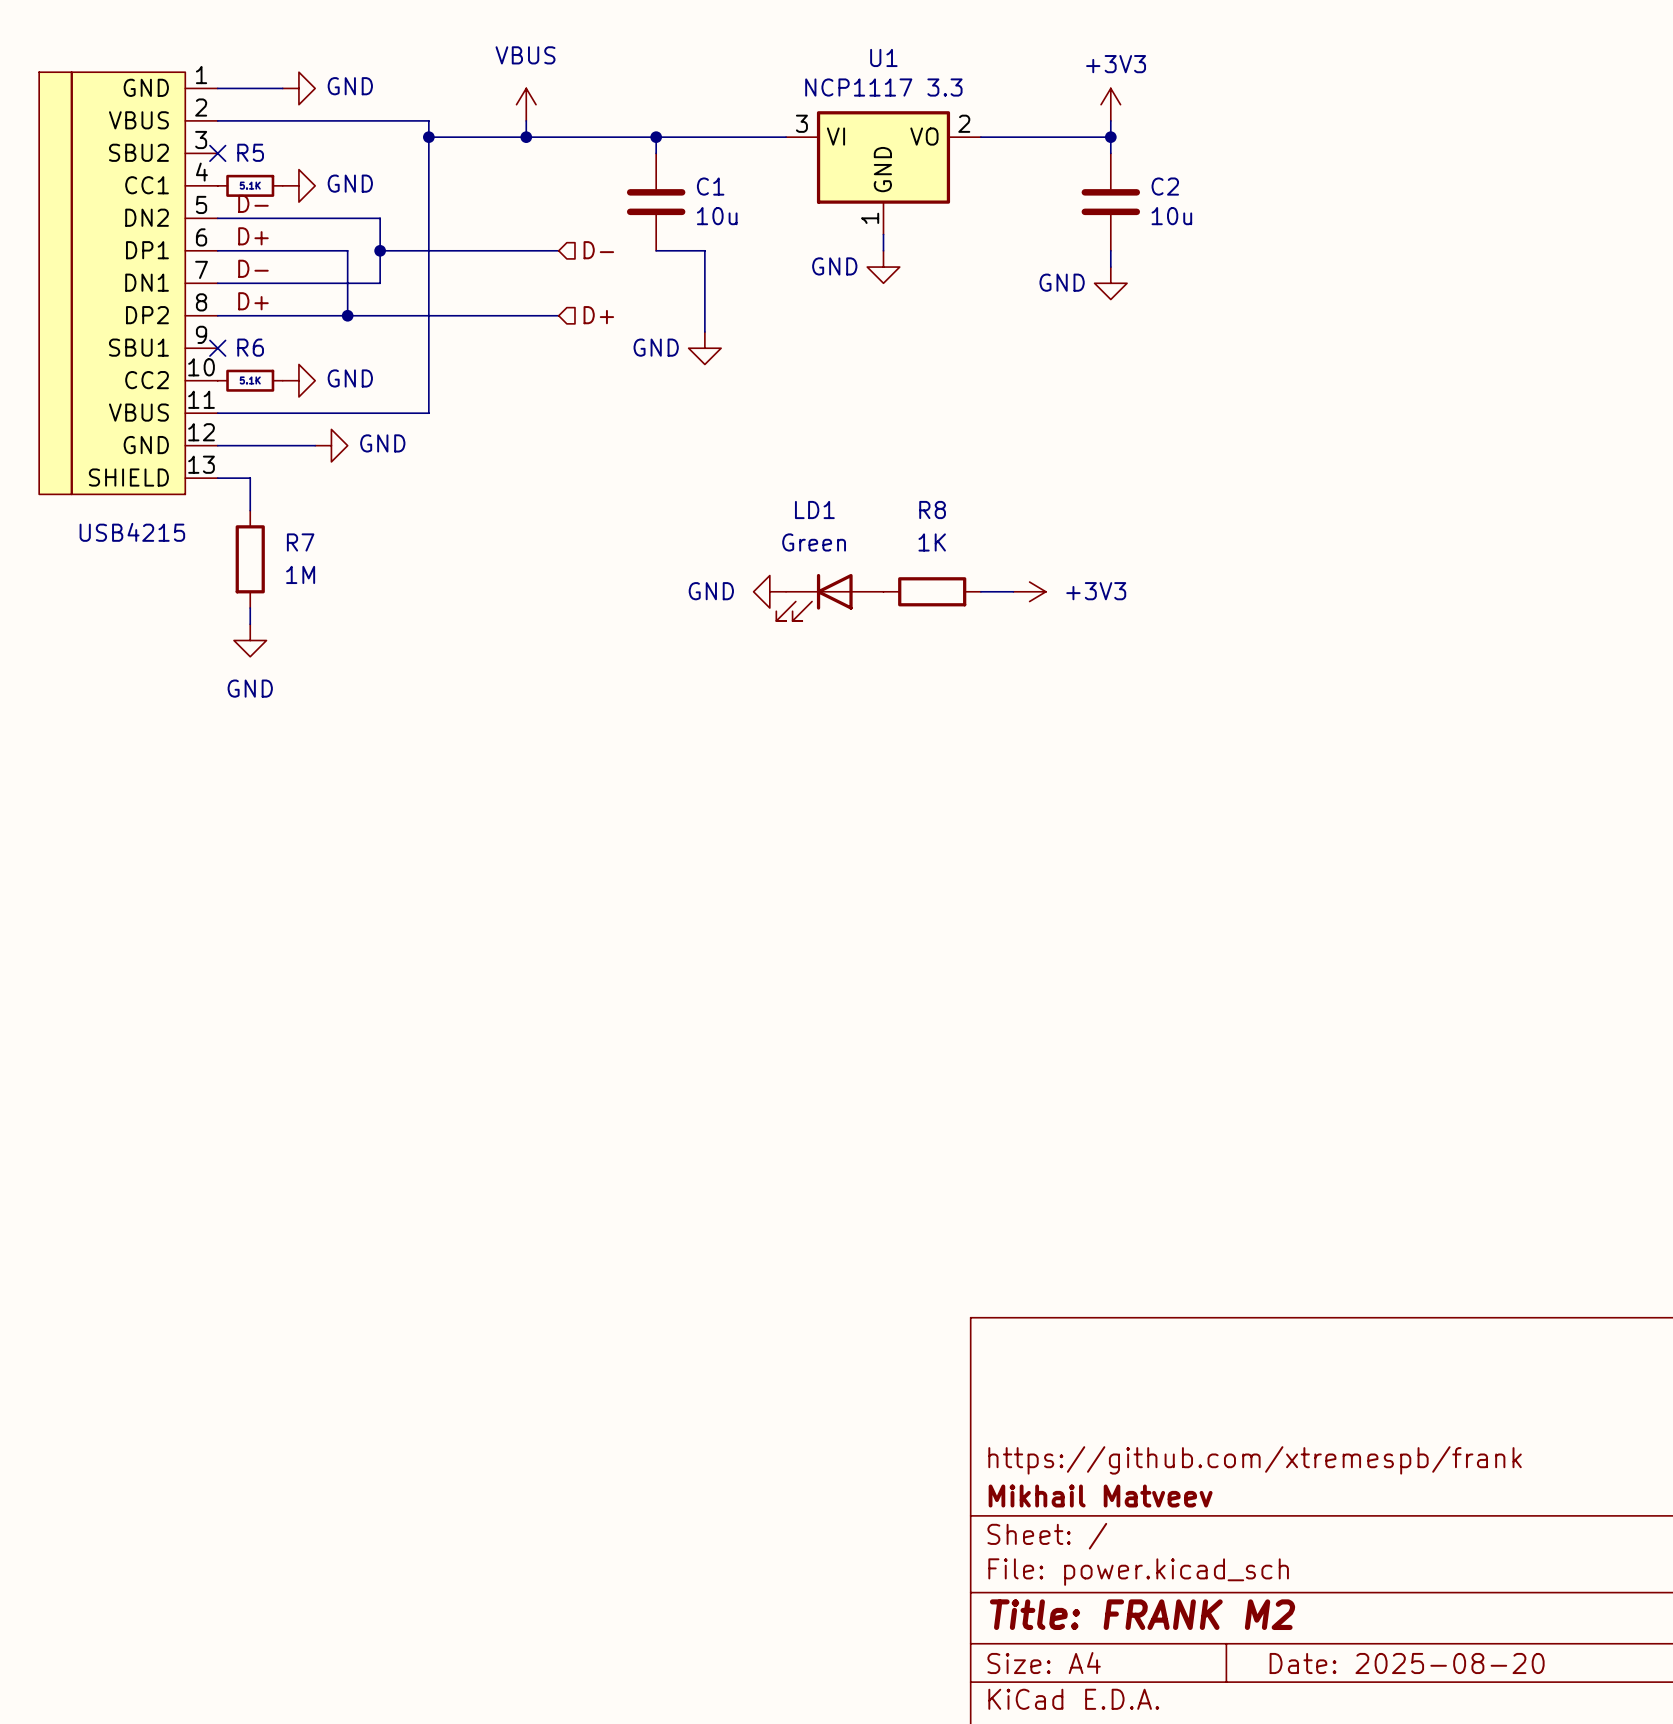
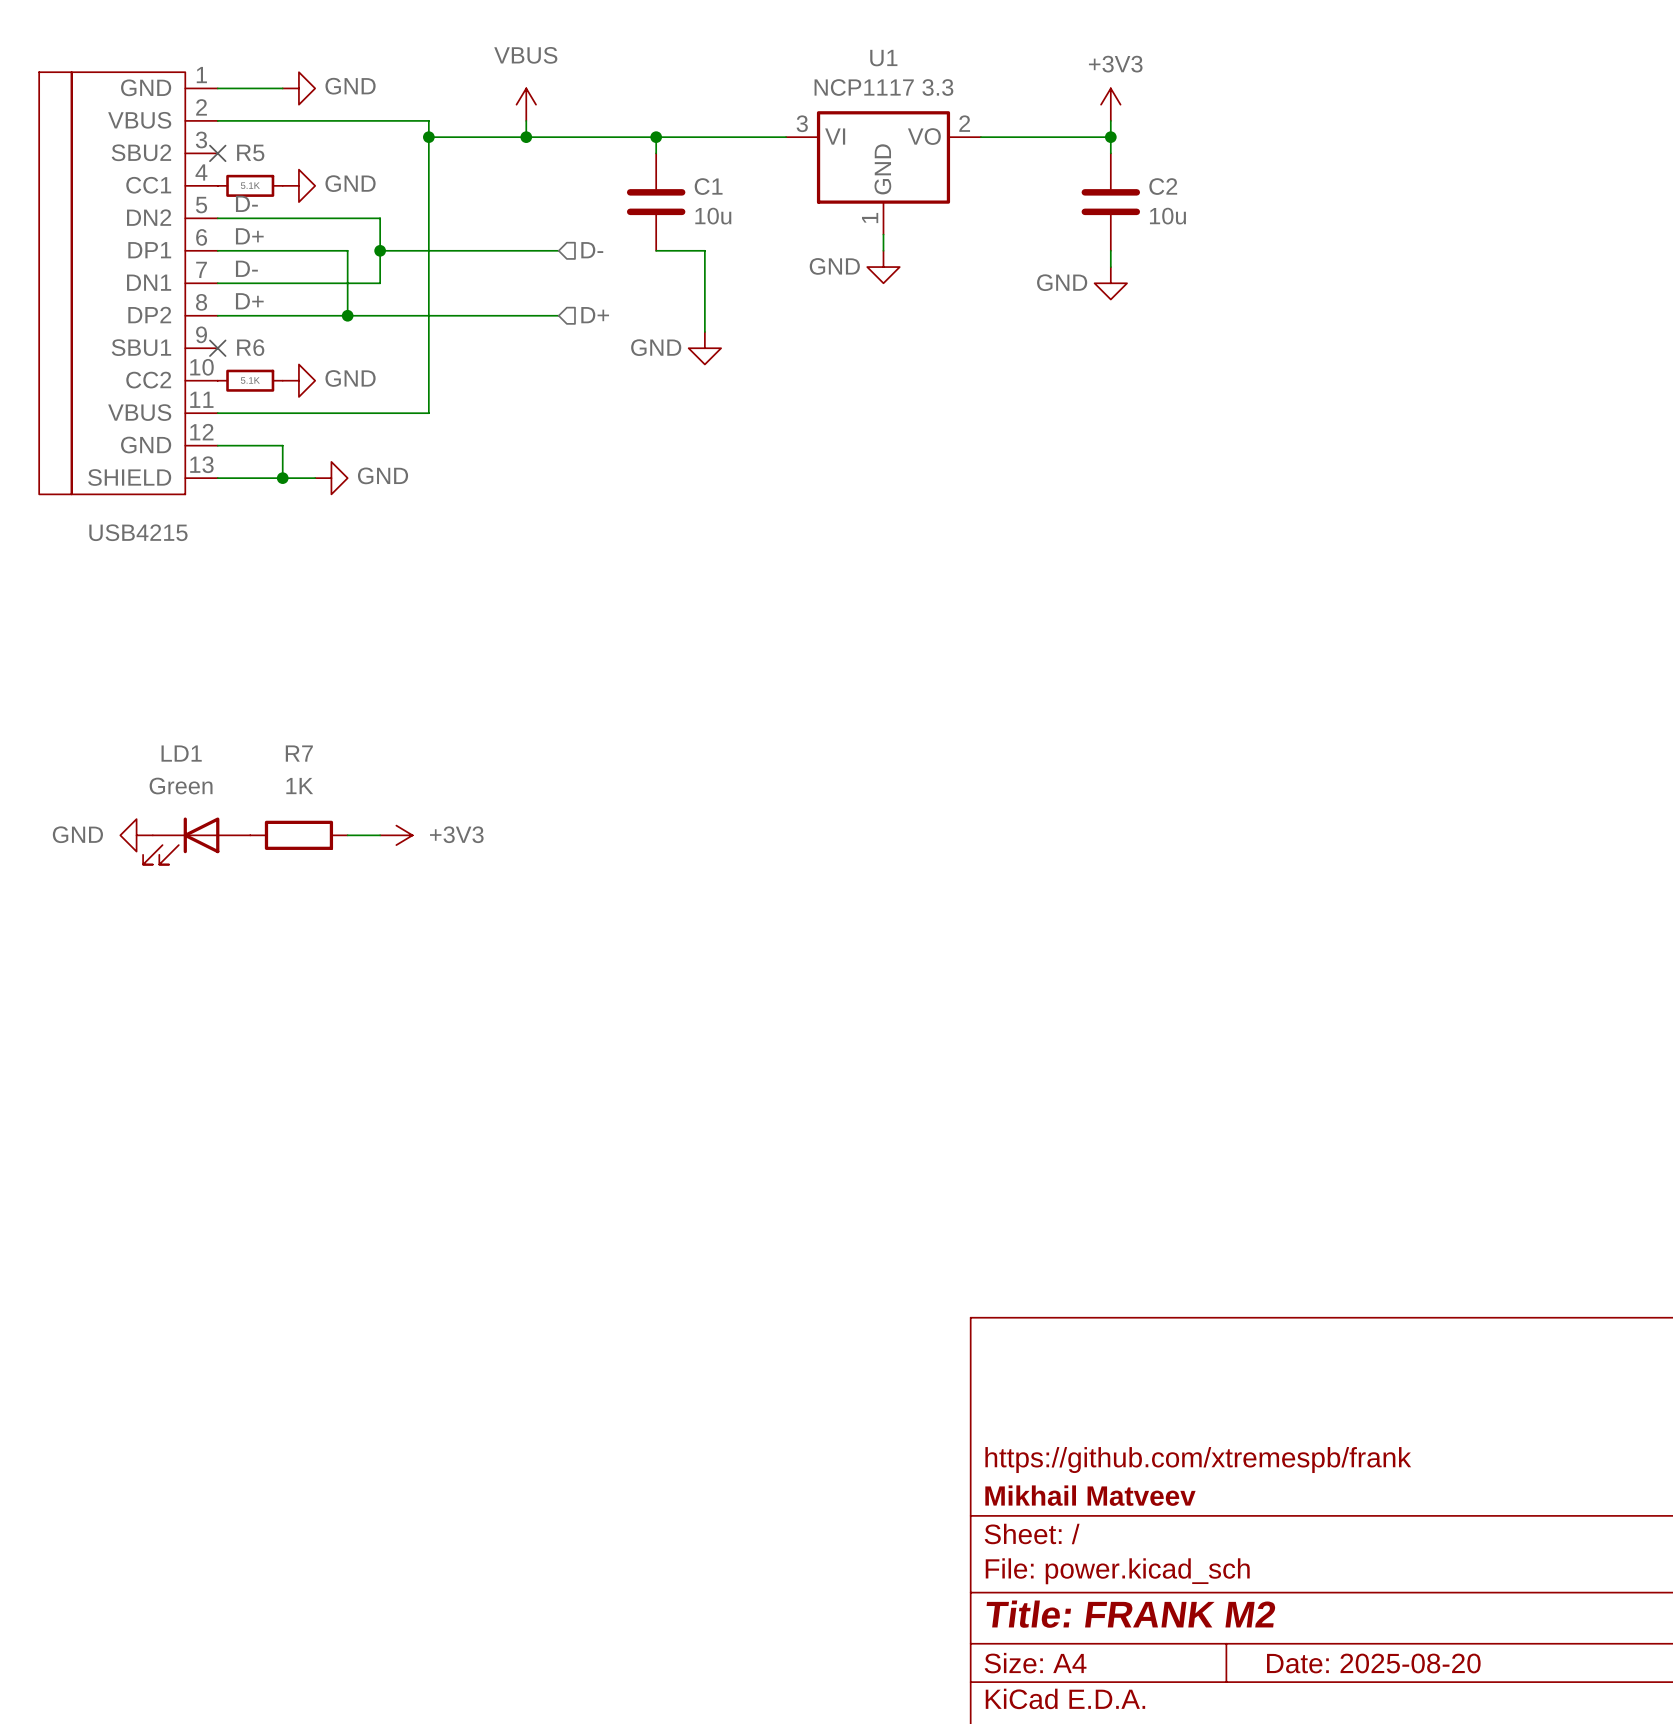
wire: (282, 445) (315, 445) -> (282, 445) (282, 478)
power symbol position: GND (331, 445) -> GND (331, 478)
wire: (250, 478) (250, 510) -> (250, 478) (315, 478)
junction: none -> (282, 478)
R7 name position: R7 (300, 542) -> R7 (299, 753)
R7 rotation: 0° (250, 559) -> 90° clockwise (298, 835)
R7 position: (250, 559) -> (298, 835)
R7 value: 1M (300, 574) -> 1K (299, 786)
power symbol: GND (769, 591) -> none
R8: 1K (932, 591) -> none
wire: (980, 591) (1013, 591) -> none
power symbol: +3V3 (1029, 591) -> none
LD1 position: (829, 597) -> (196, 841)
wire: (250, 608) (250, 624) -> none
power symbol: GND (250, 640) -> none
power symbol: none -> GND (136, 835)
wire: none -> (347, 835) (380, 835)
power symbol: none -> +3V3 (396, 835)

